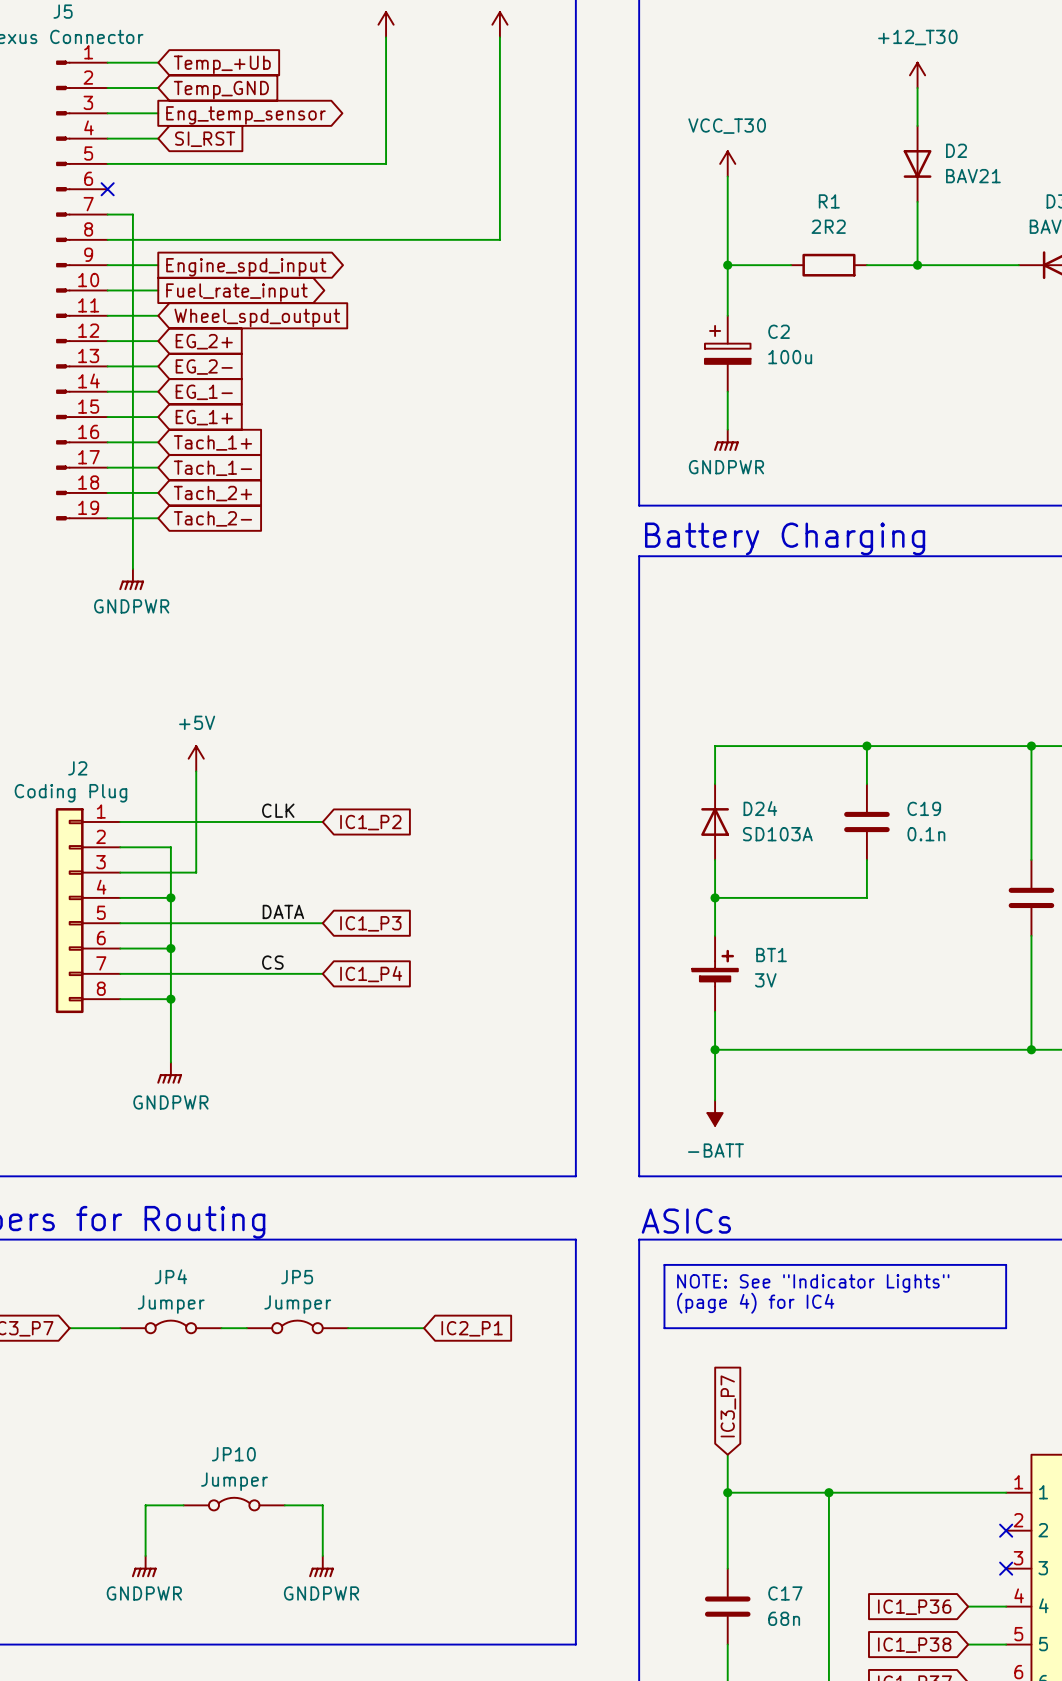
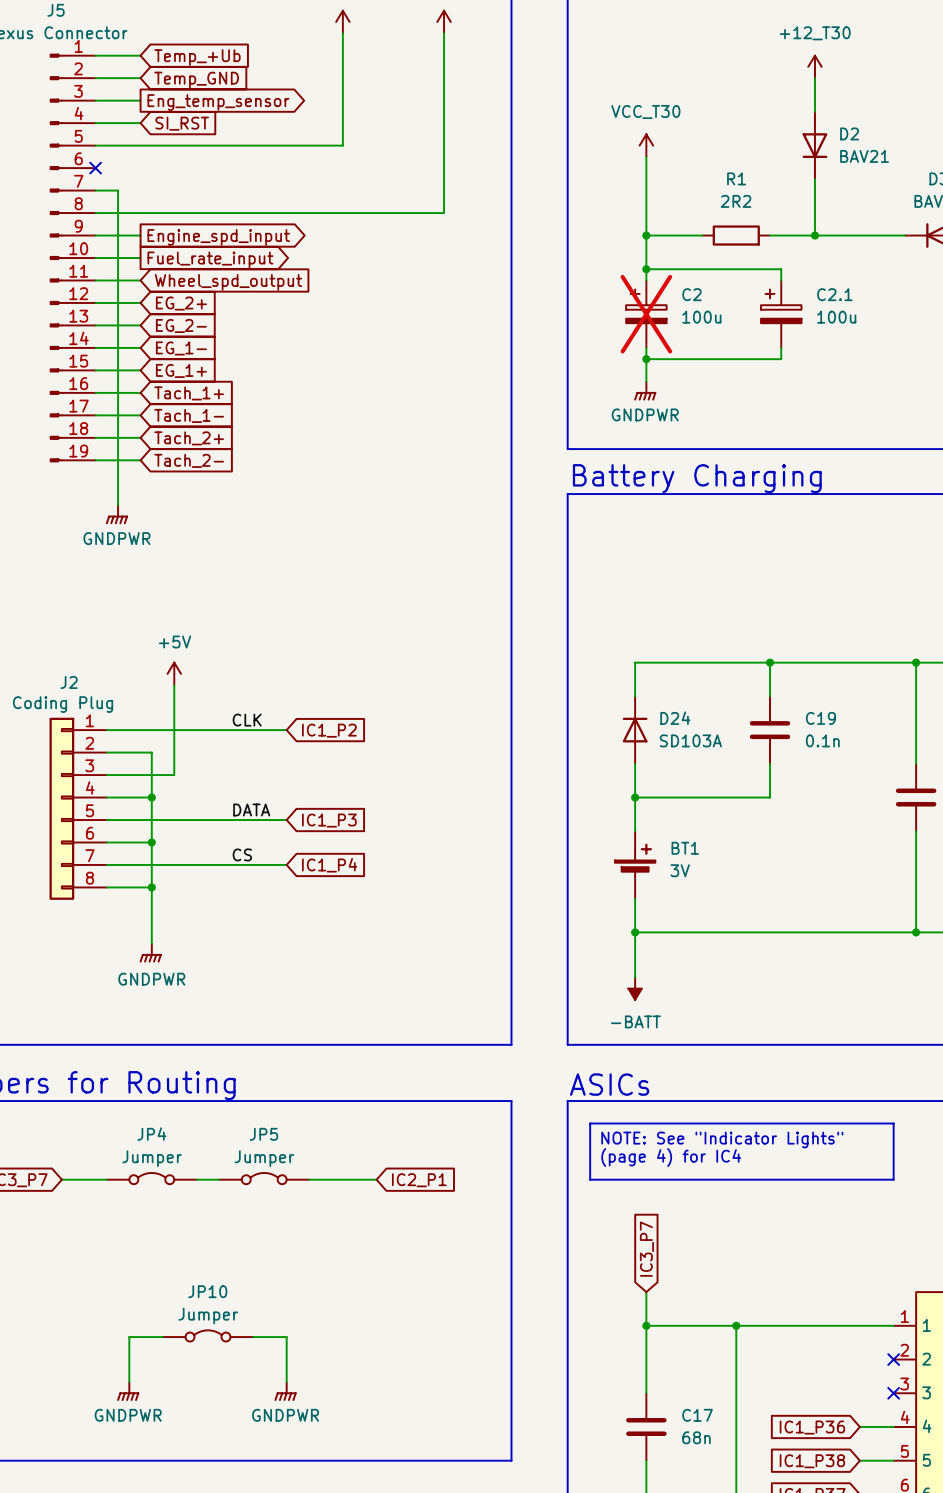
wire: none -> (646, 269) (781, 269) (781, 280)
junction: none -> (646, 269)
C2 do-not-place cross: none -> (646, 314)
C2.1: none -> 100u (781, 314)
wire: none -> (781, 347) (781, 359) (646, 359)
junction: none -> (646, 359)

